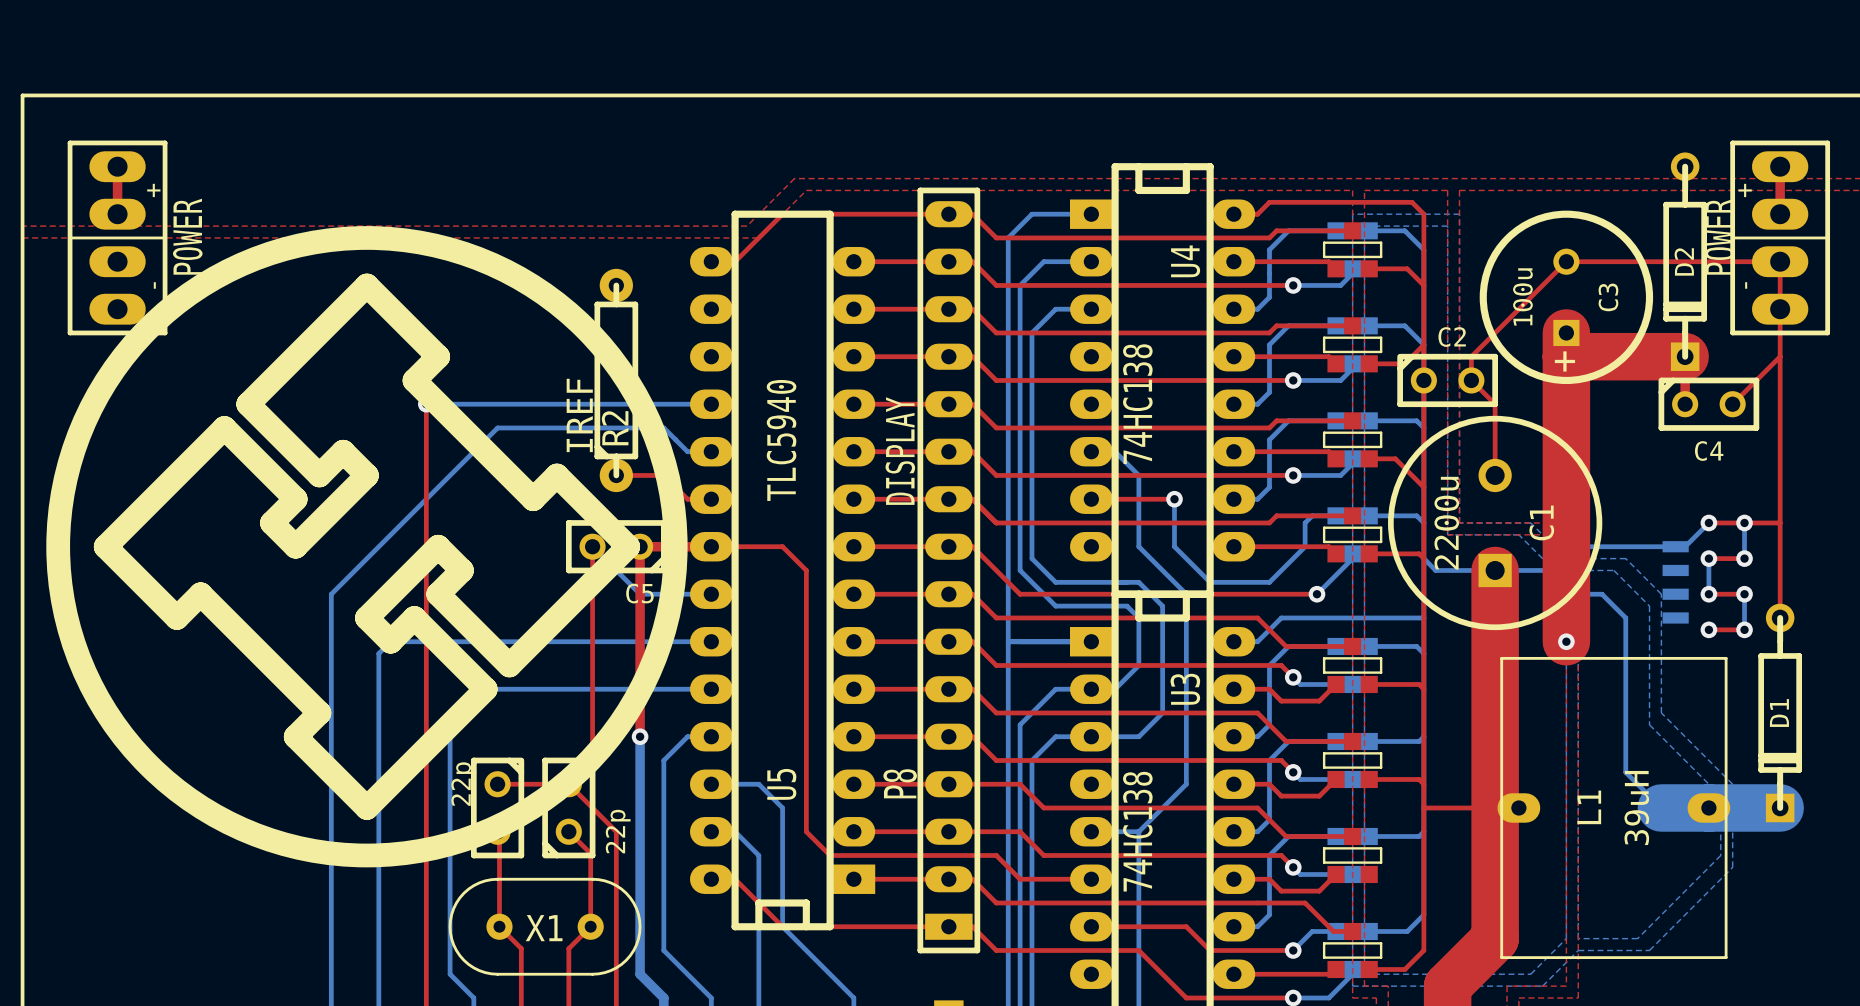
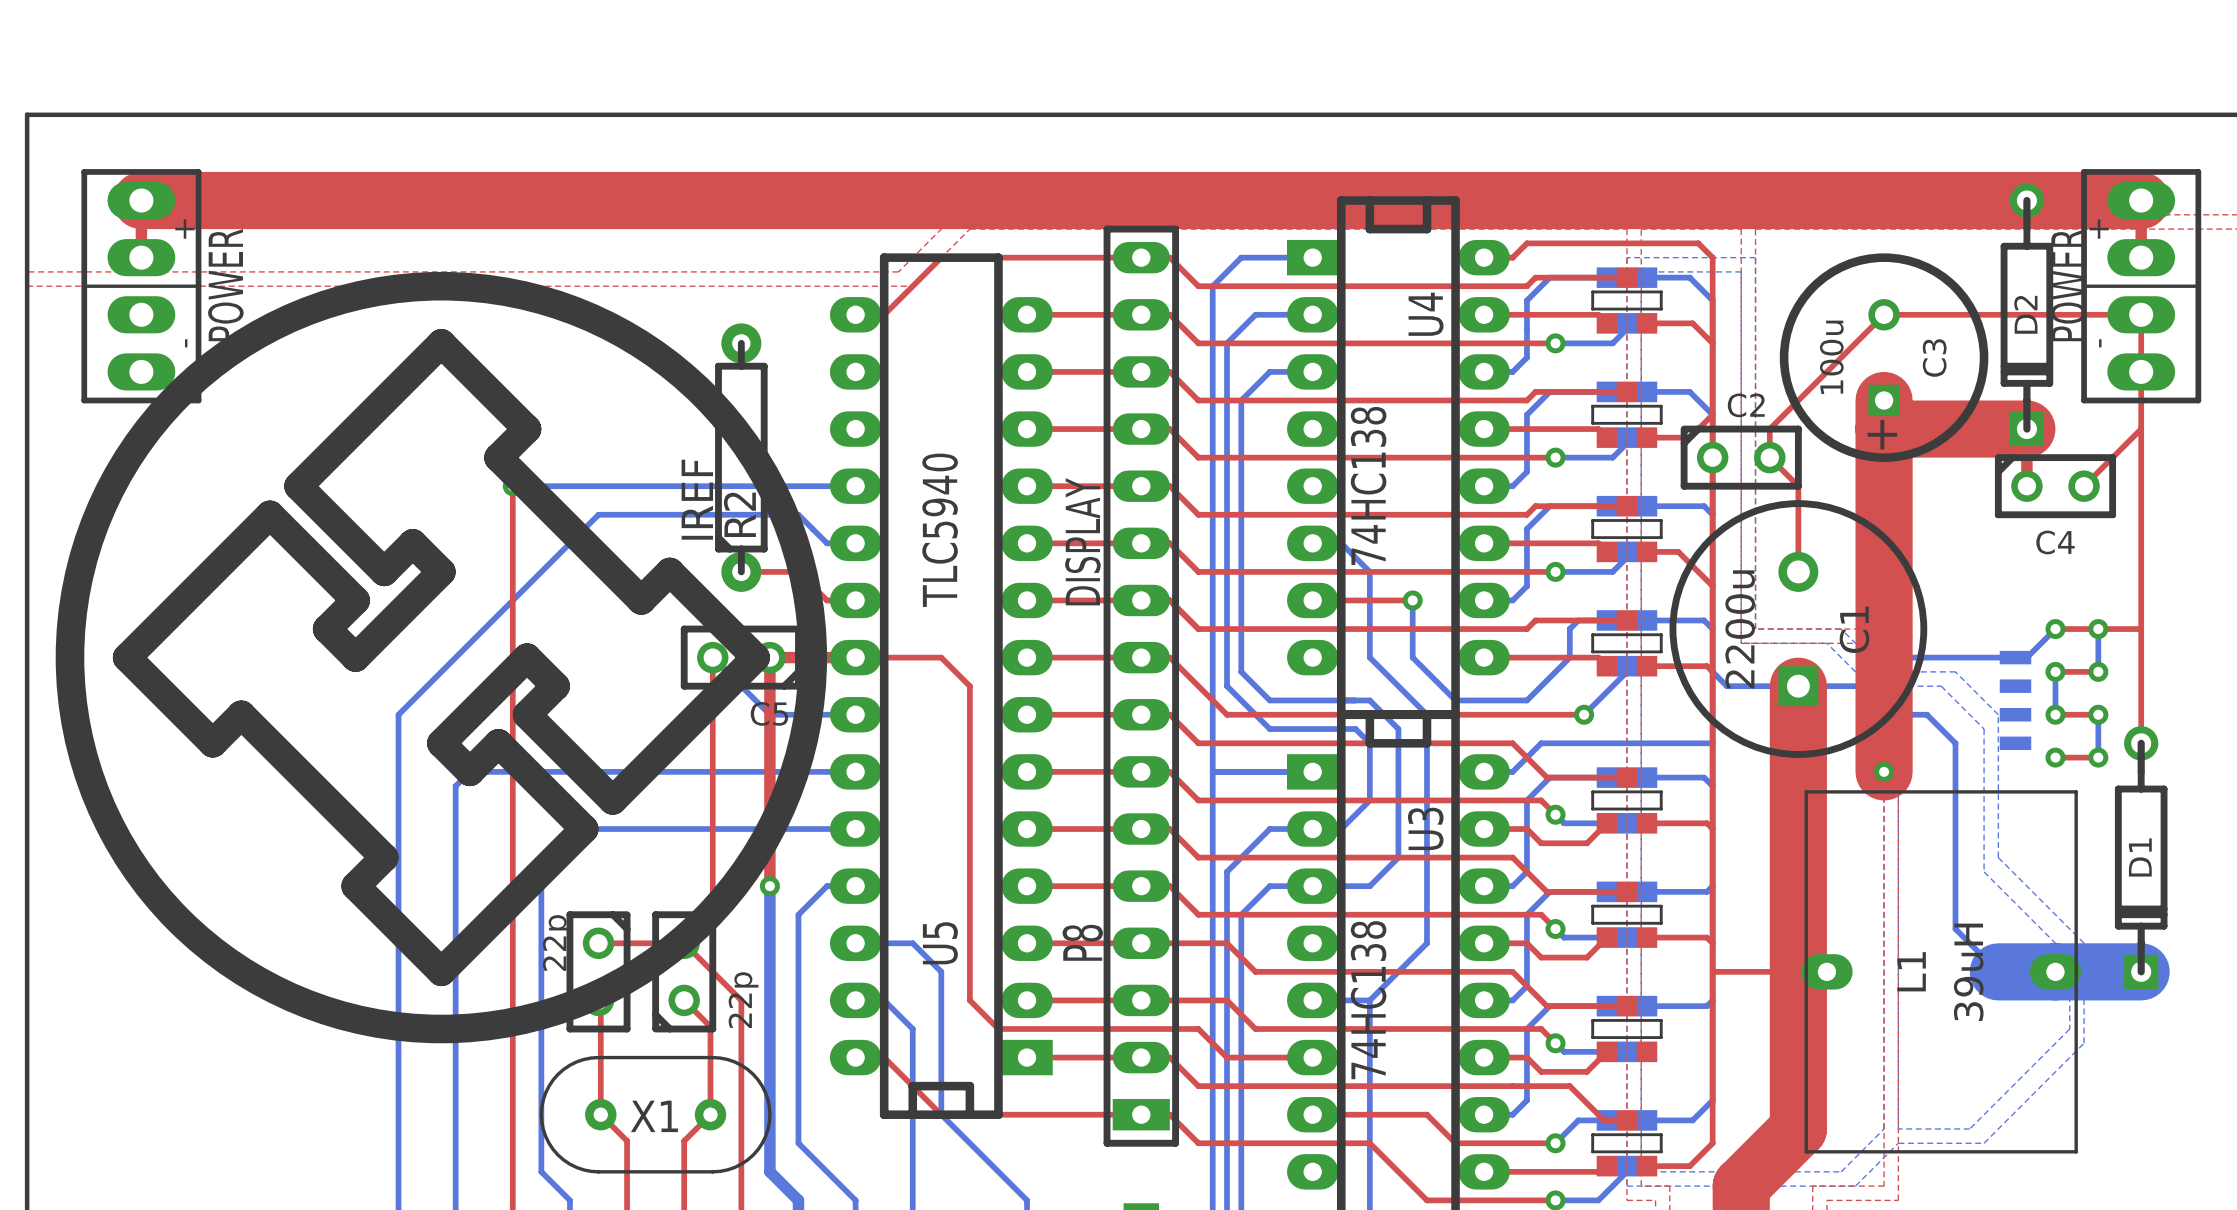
top track: none -> (141, 200) (2141, 200)

